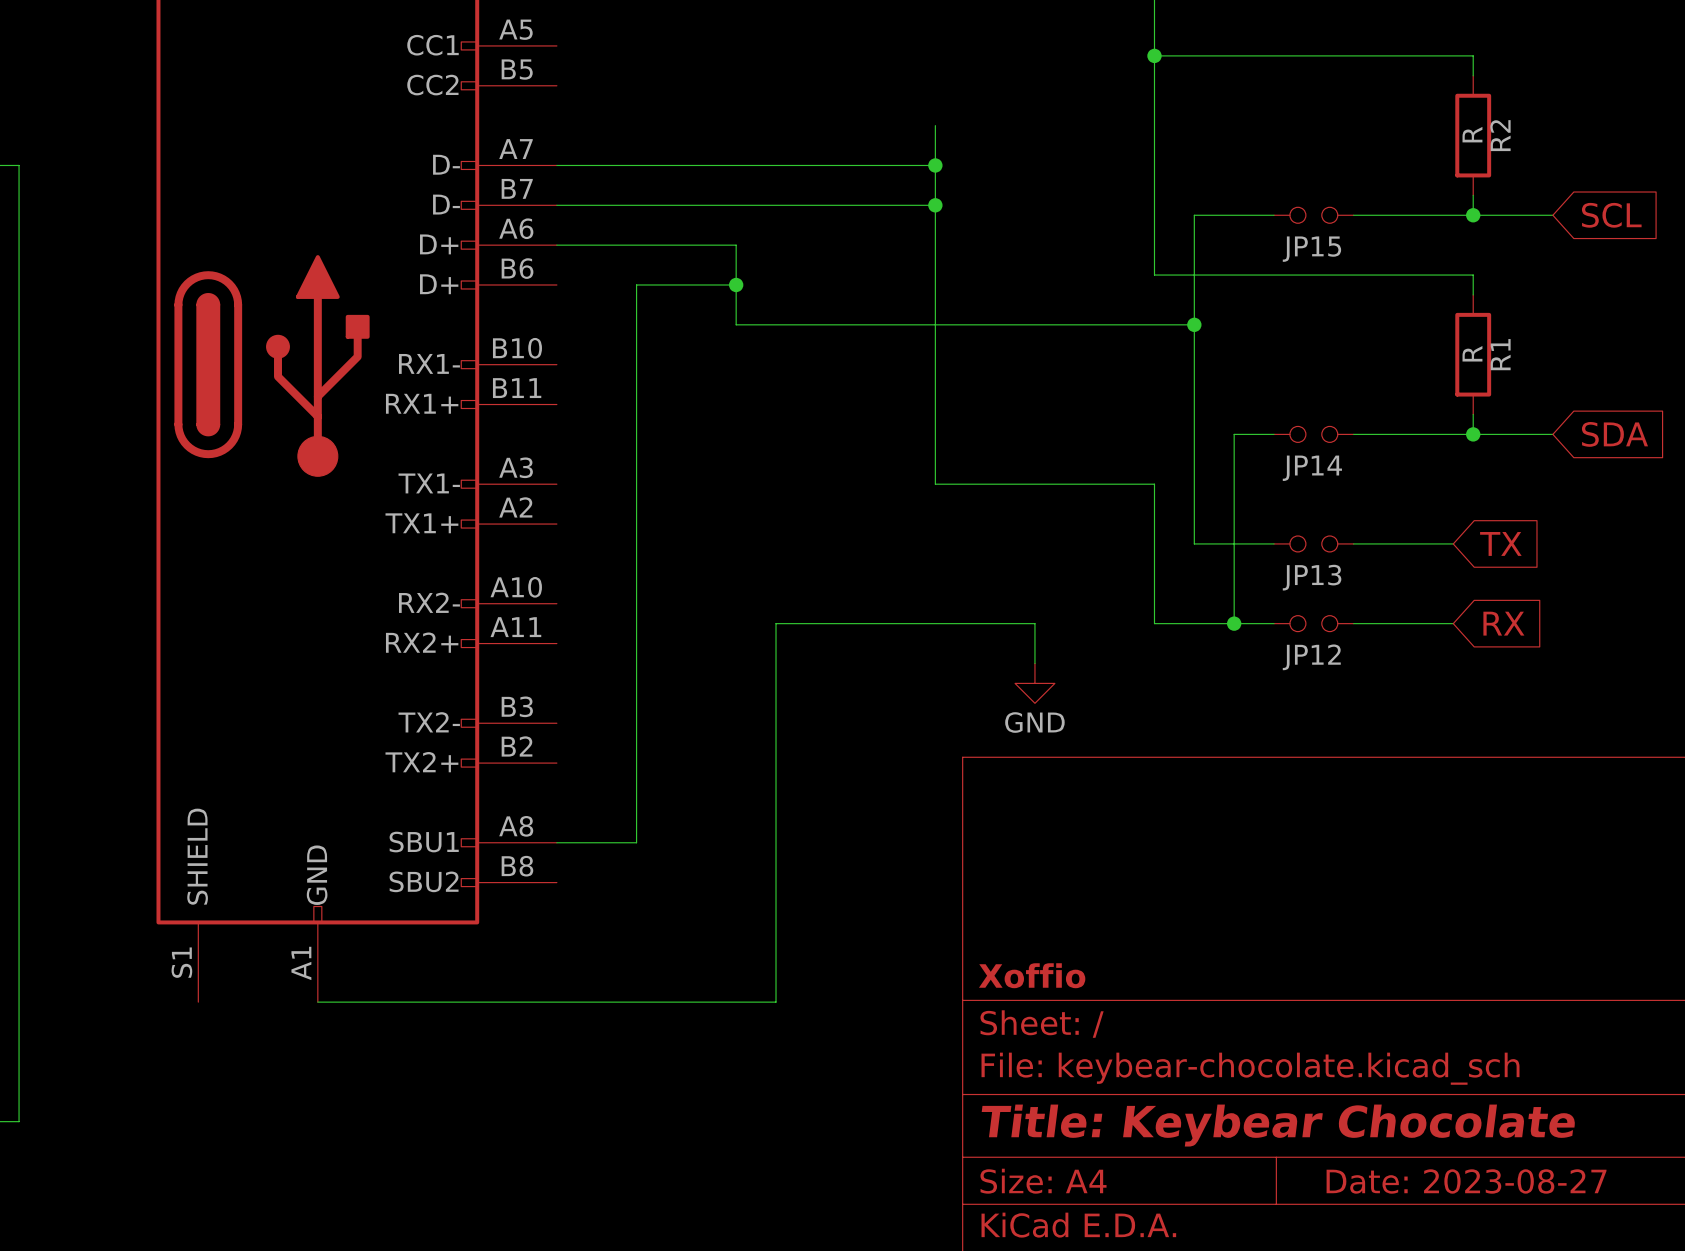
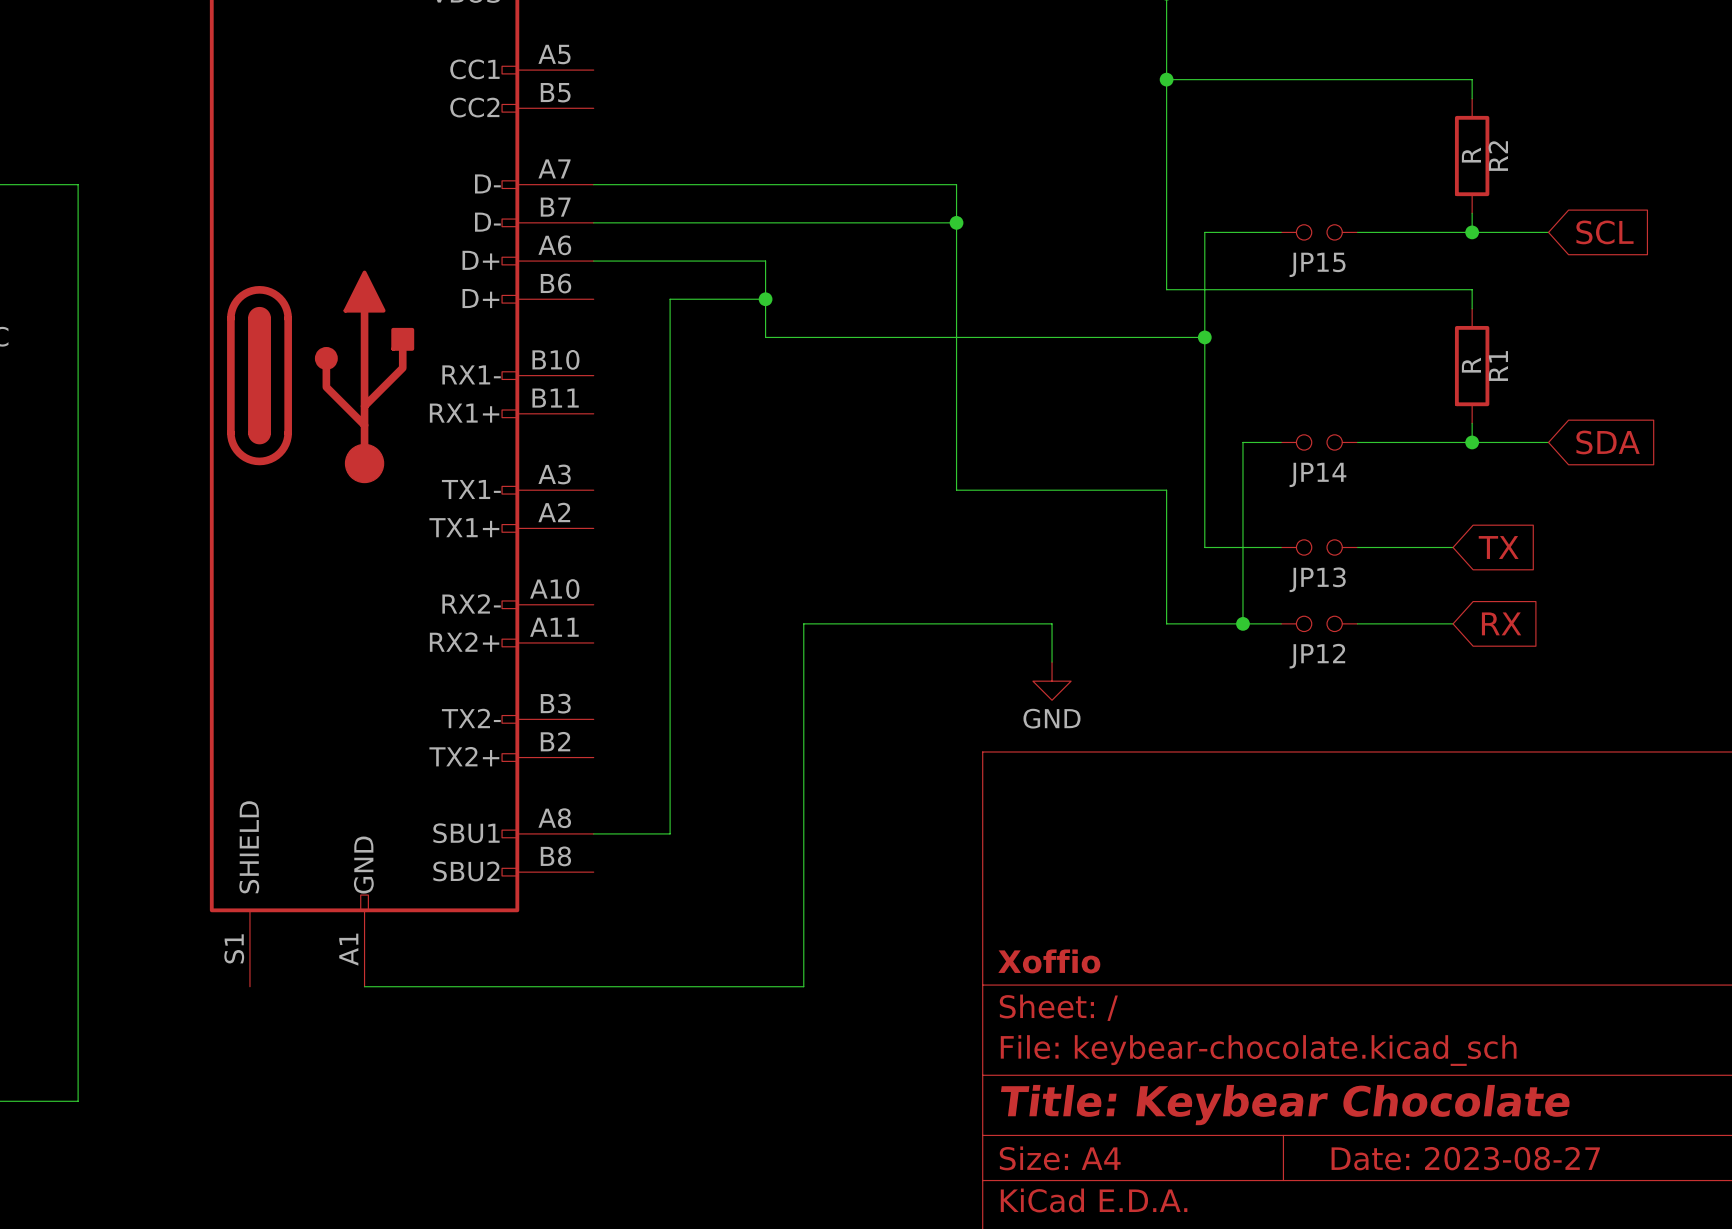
wire: (935, 125) (935, 165) -> none
junction: (935, 165) -> none

